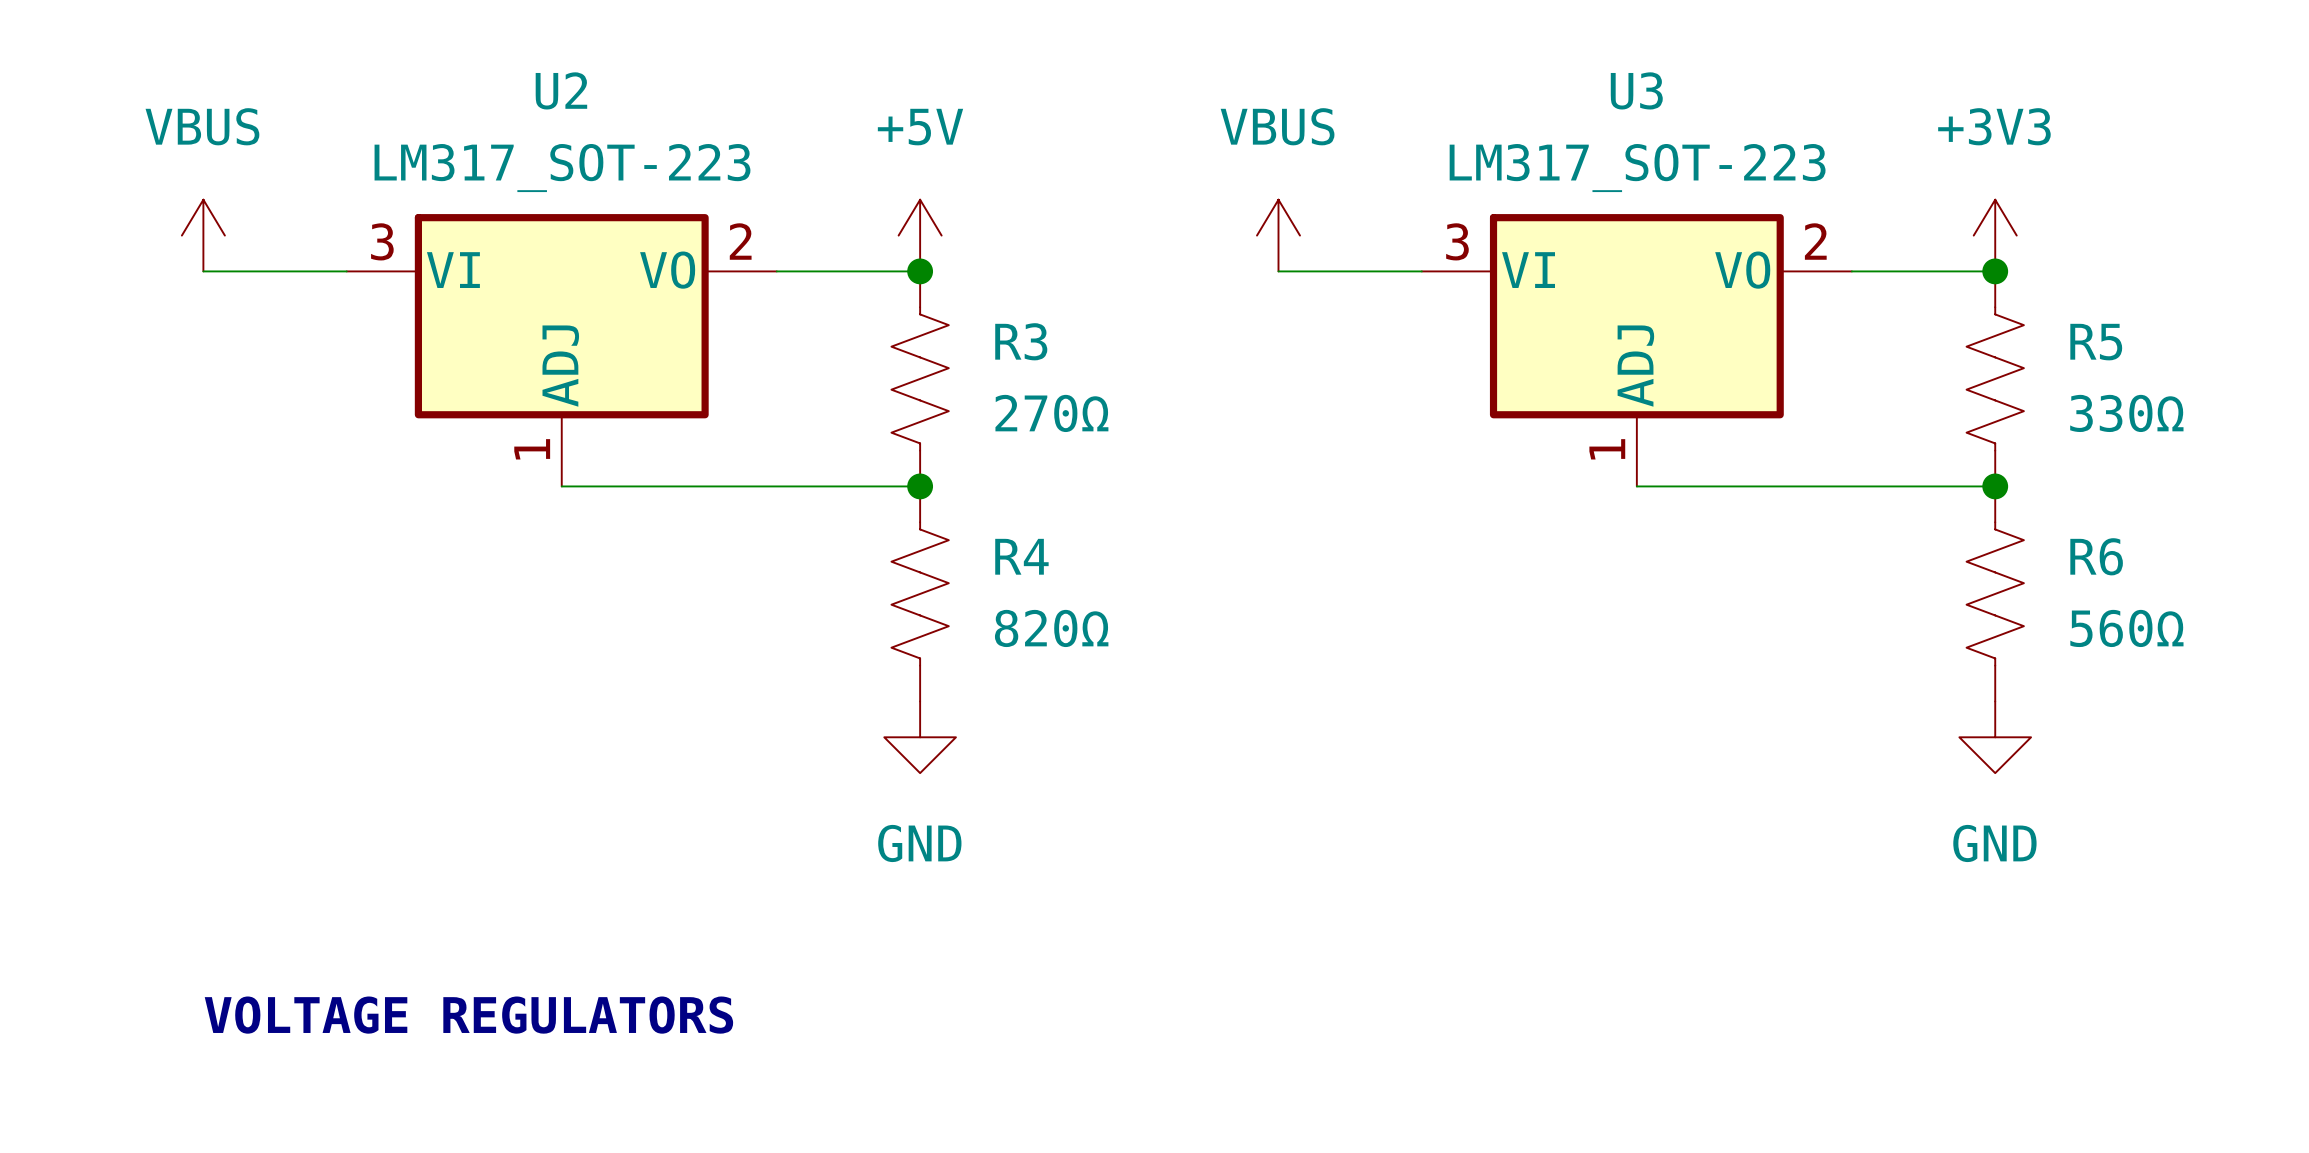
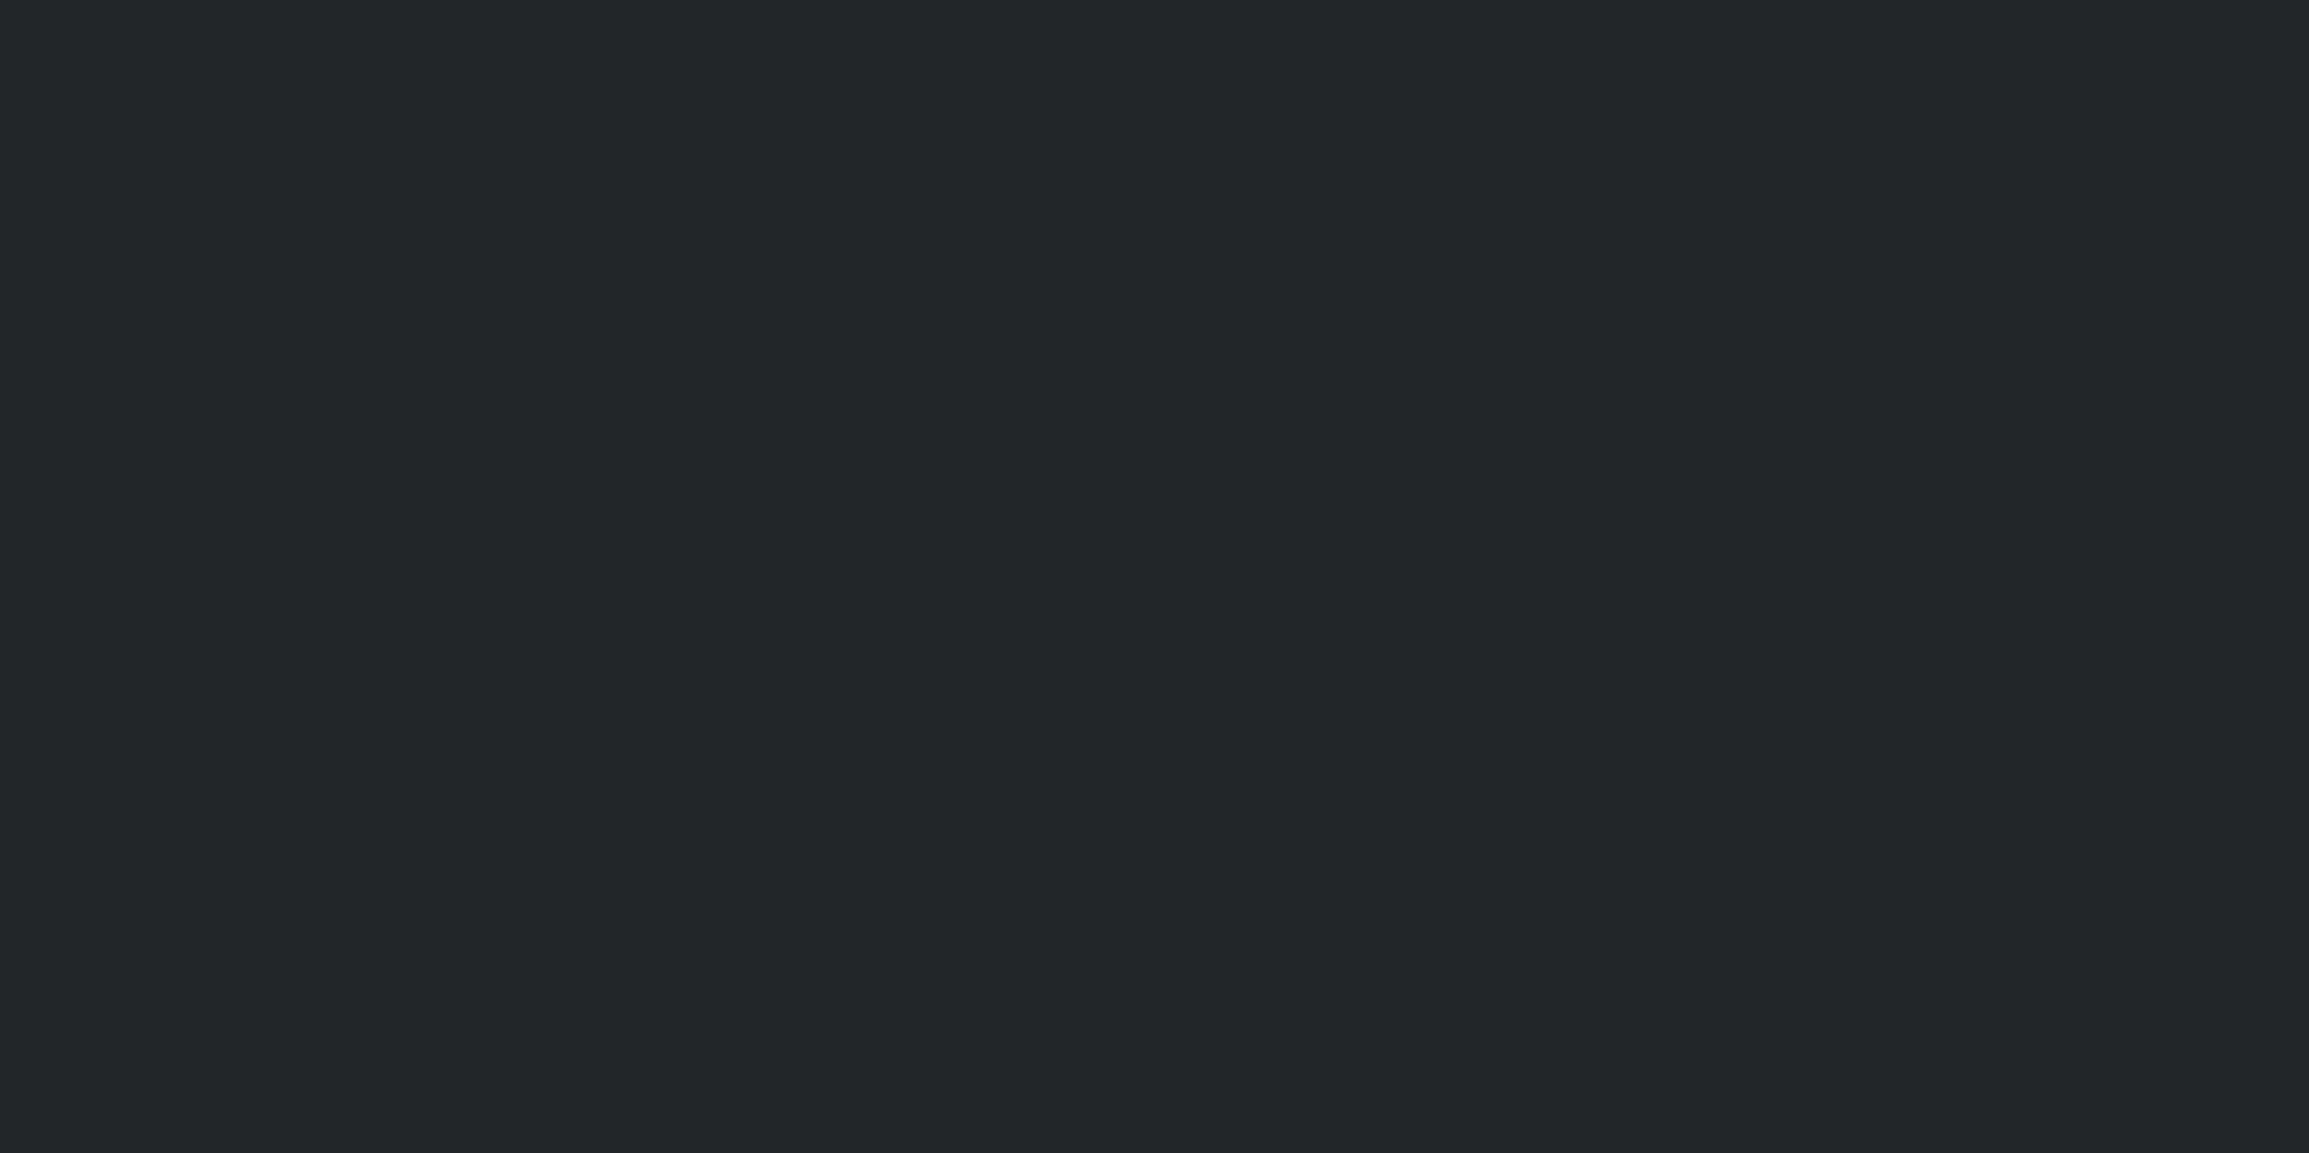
power symbol: VBUS (203, 235) -> none
power symbol: +5V (920, 235) -> none
power symbol: VBUS (1278, 235) -> none
power symbol: +3V3 (1995, 235) -> none
wire: (203, 271) (346, 271) -> none
wire: (776, 271) (920, 271) -> none
junction: (920, 271) -> none
wire: (1278, 271) (1421, 271) -> none
wire: (1851, 271) (1995, 271) -> none
junction: (1995, 271) -> none
U2: LM317_SOT-223 (561, 350) -> none
U3: LM317_SOT-223 (1636, 350) -> none
R3: 270Ω (920, 378) -> none
R5: 330Ω (1995, 378) -> none
wire: (561, 486) (920, 486) -> none
junction: (920, 486) -> none
wire: (1636, 486) (1995, 486) -> none
junction: (1995, 486) -> none
R4: 820Ω (920, 593) -> none
R6: 560Ω (1995, 593) -> none
power symbol: GND (920, 737) -> none
power symbol: GND (1995, 737) -> none
text: VOLTAGE REGULATORS (468, 1015) -> none

